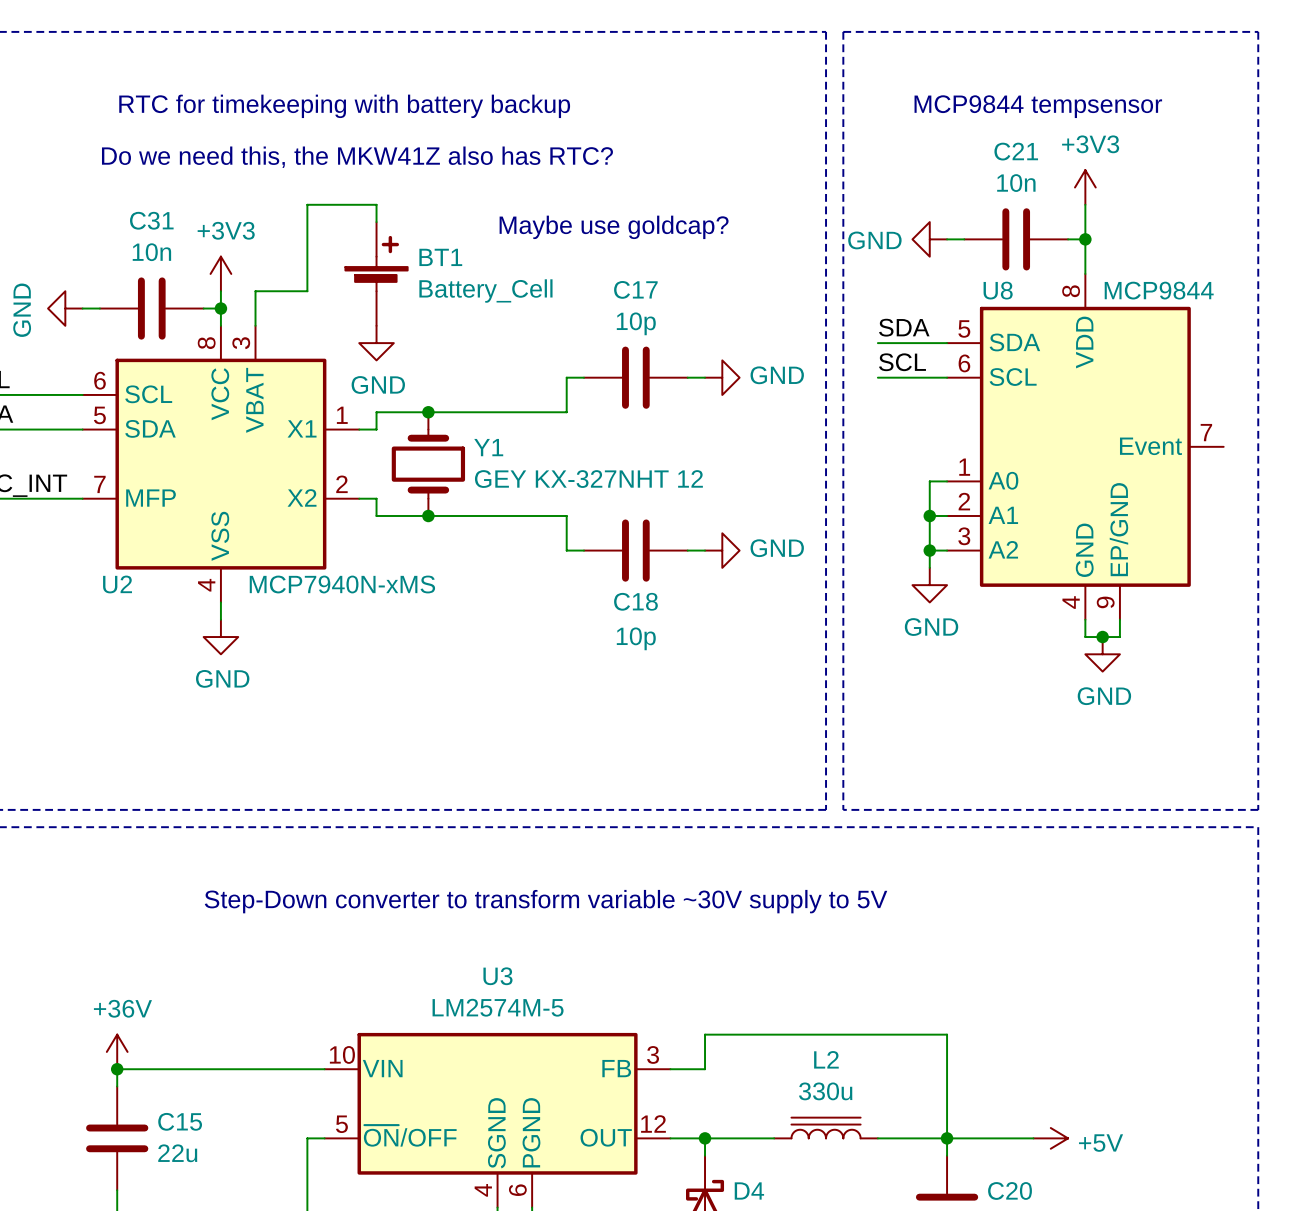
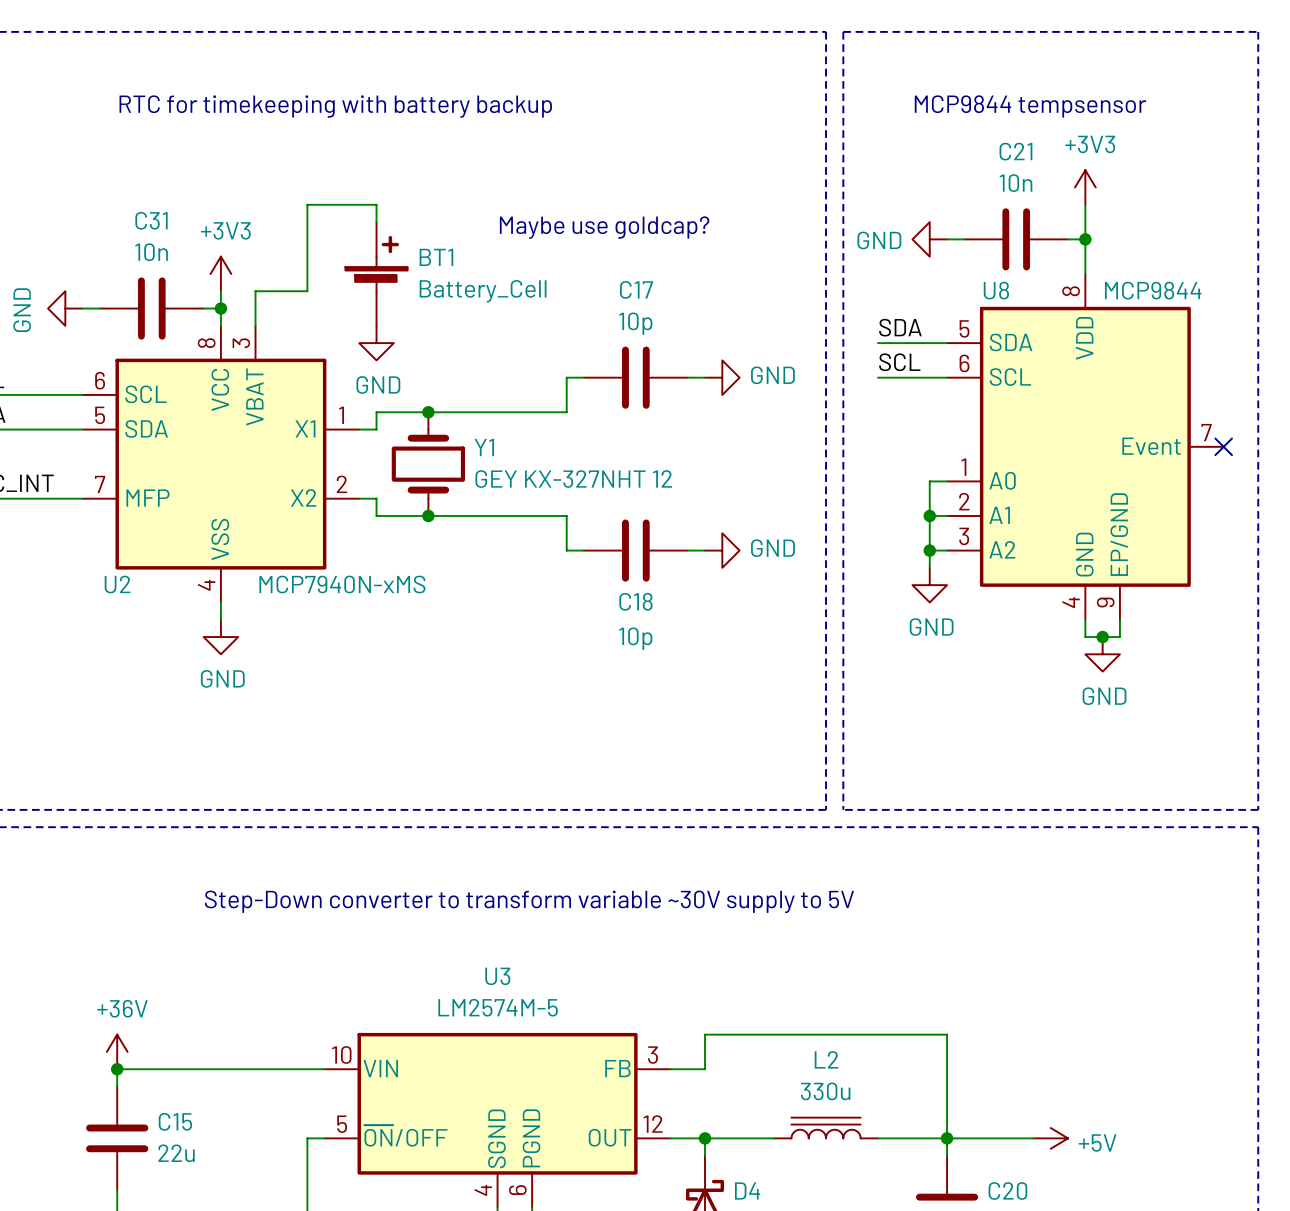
text: Do we need this, the MKW41Z also has RTC? (357, 157) -> none
no-connect mark: none -> (1223, 446)

